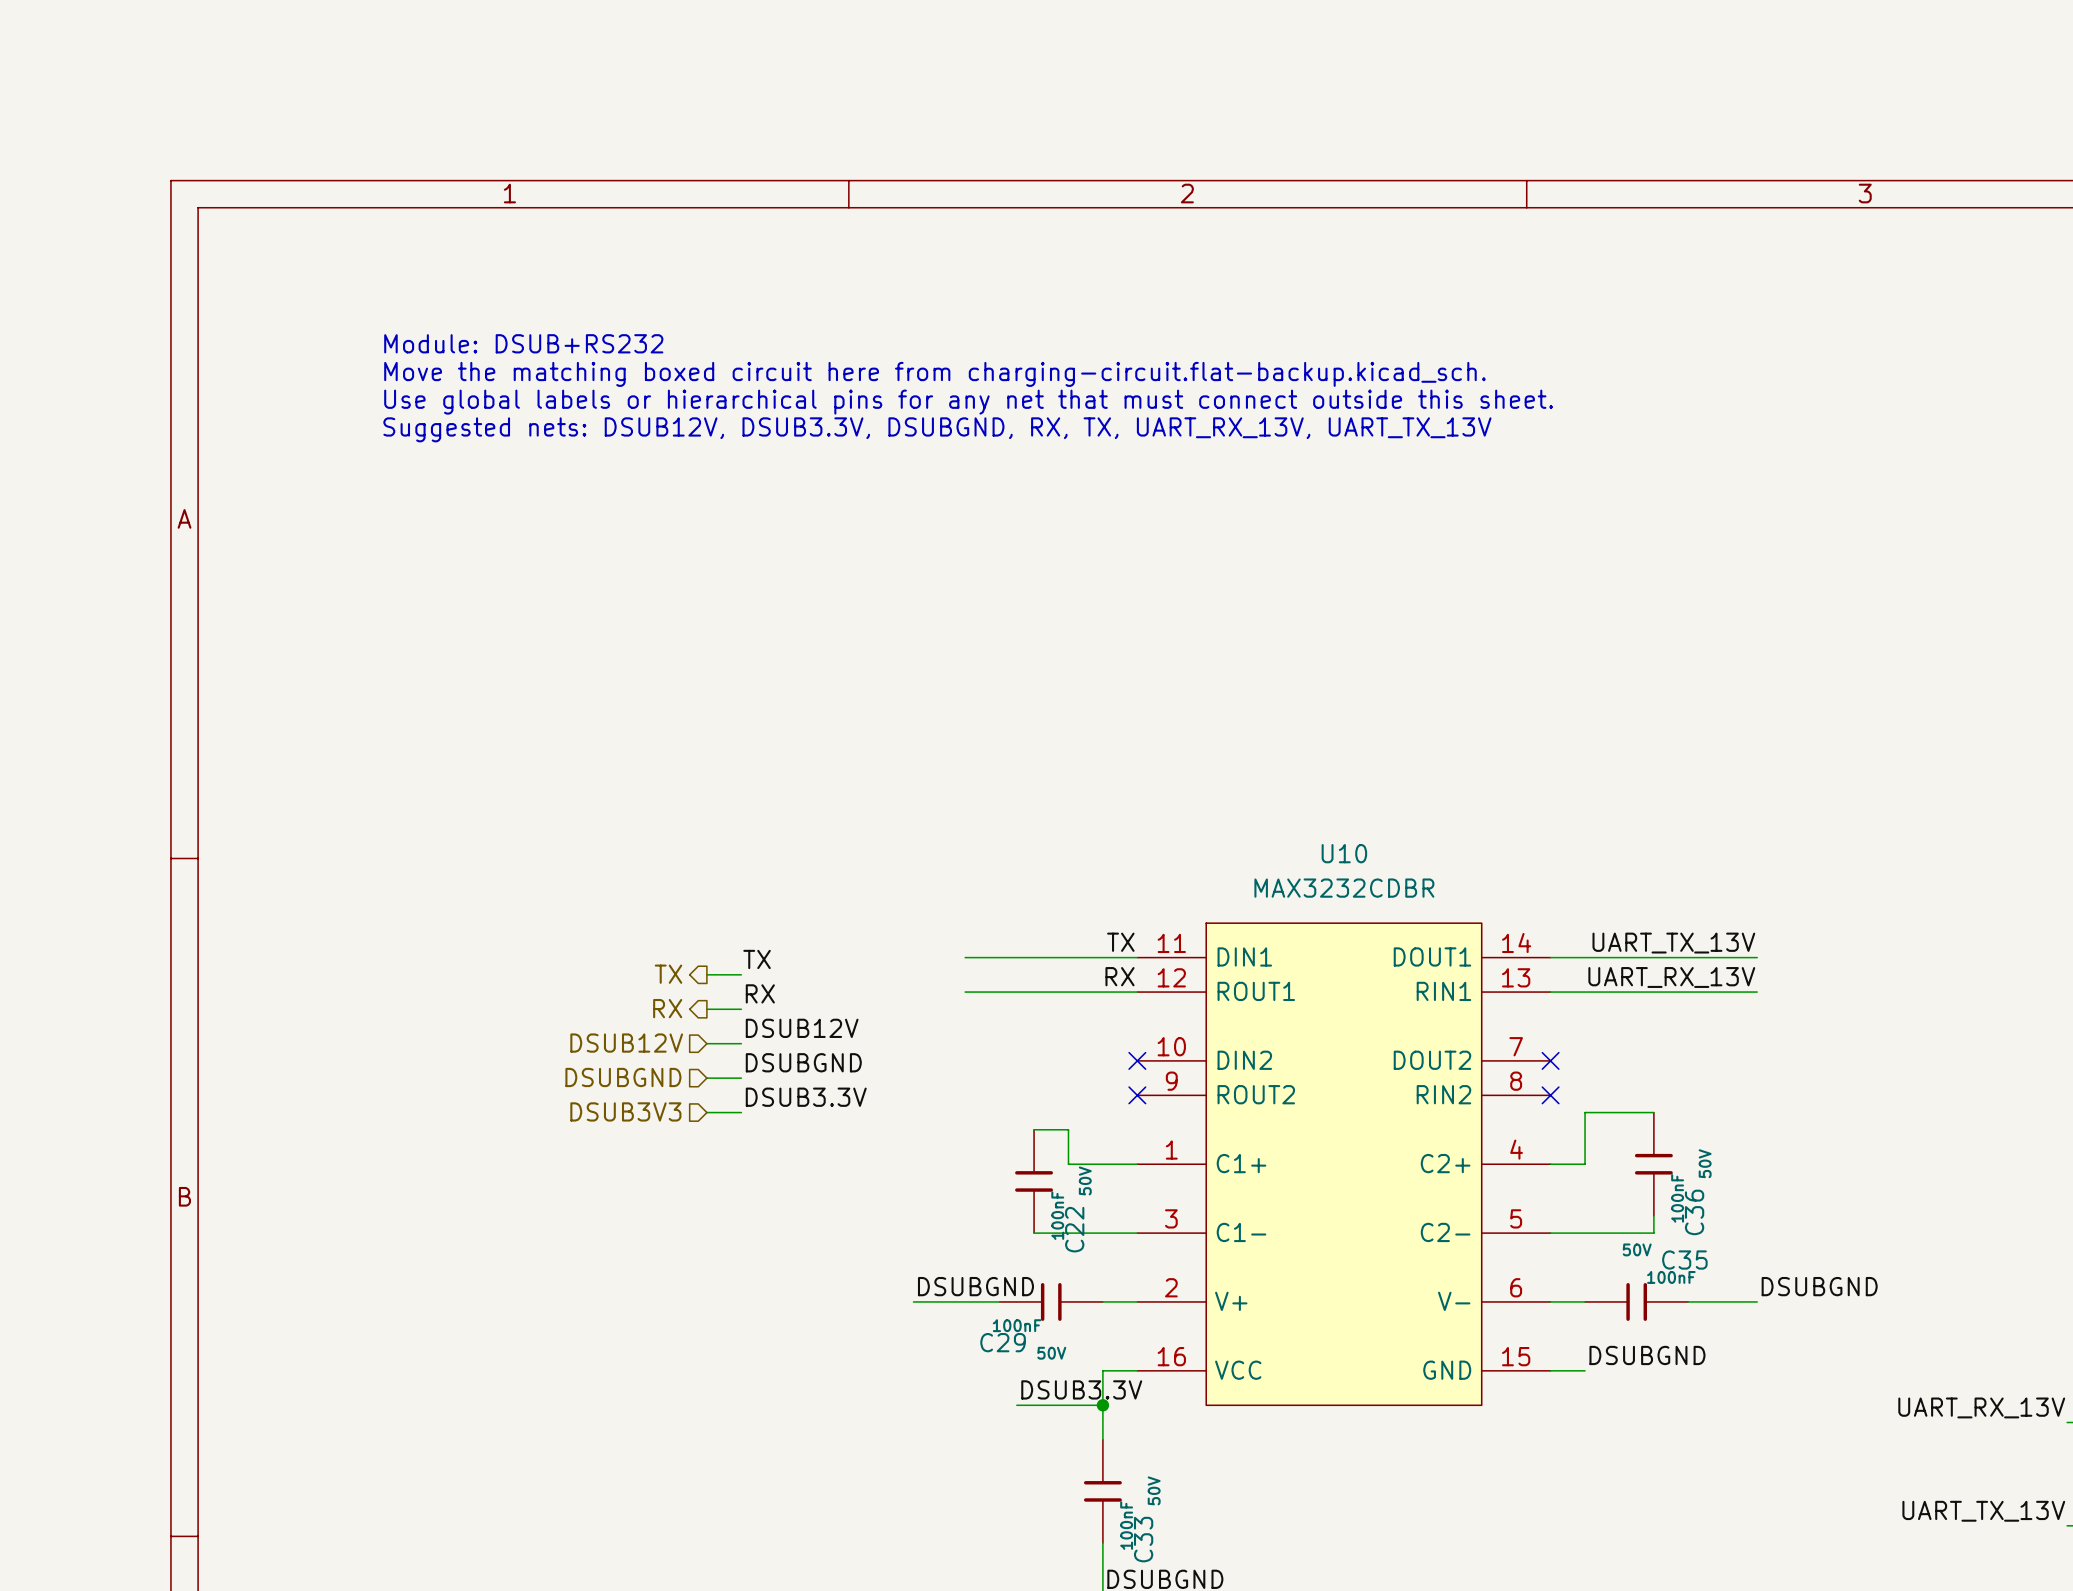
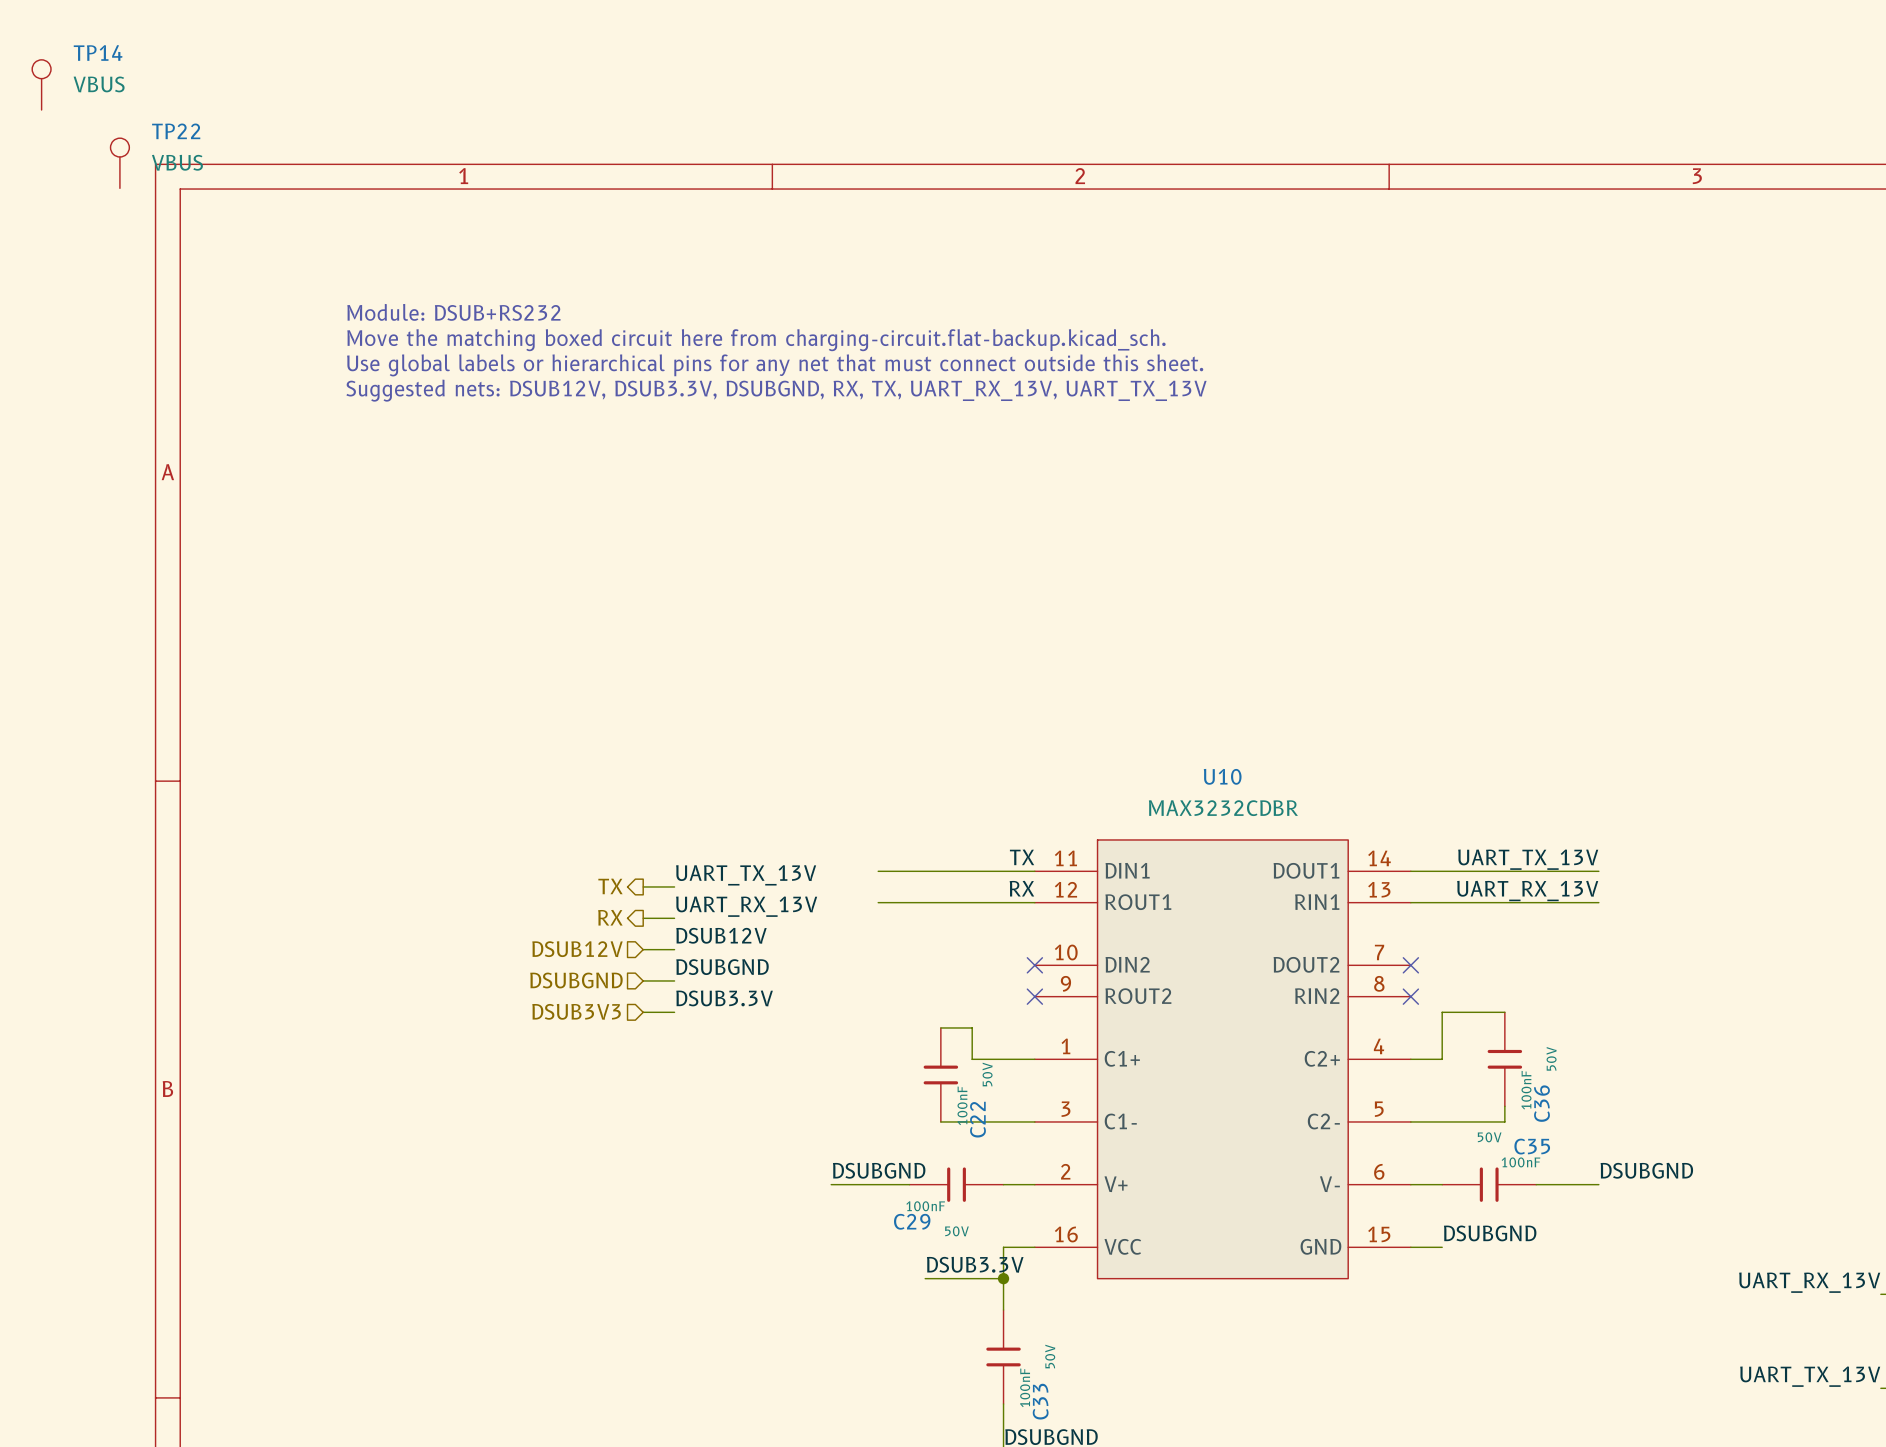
TP14: none -> VBUS (41, 84)
TP22: none -> VBUS (119, 163)
label: TX (757, 959) -> UART_TX_13V (746, 875)
label: RX (760, 993) -> UART_RX_13V (746, 906)

